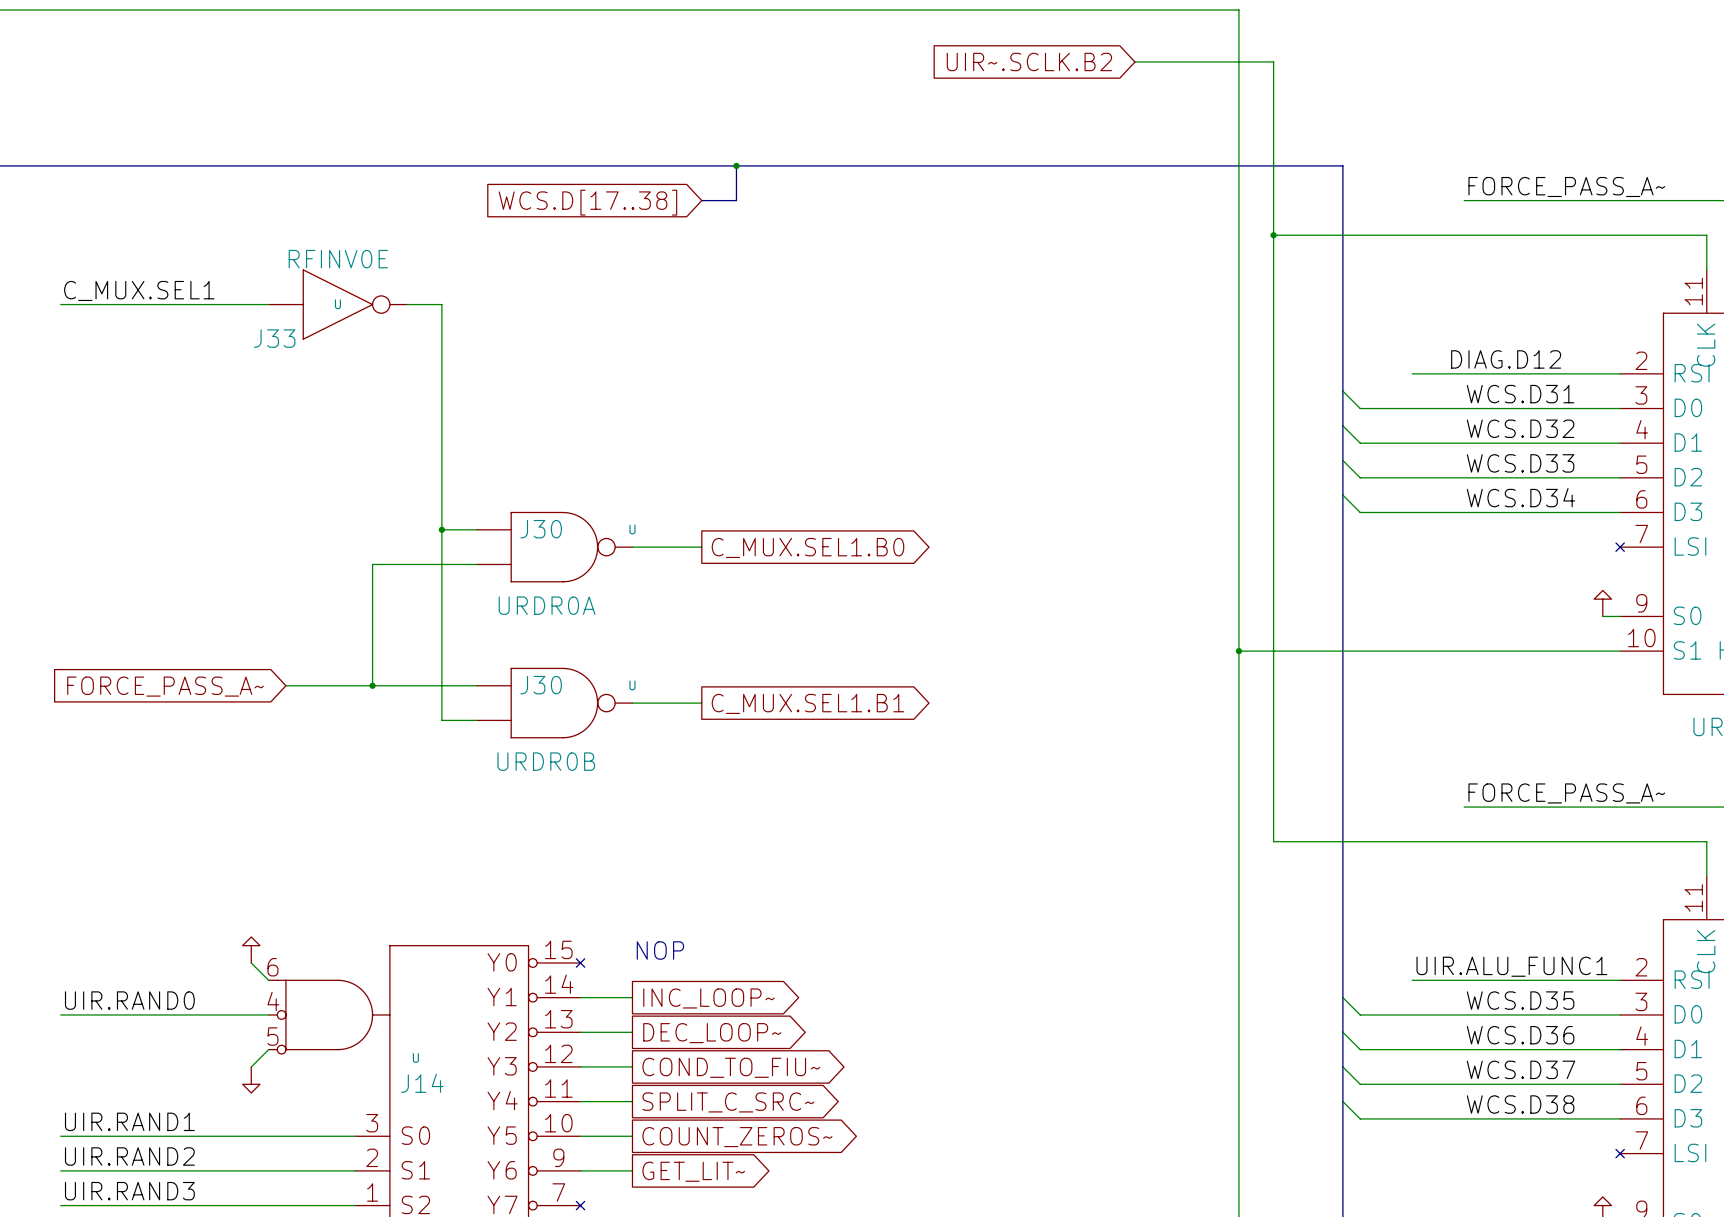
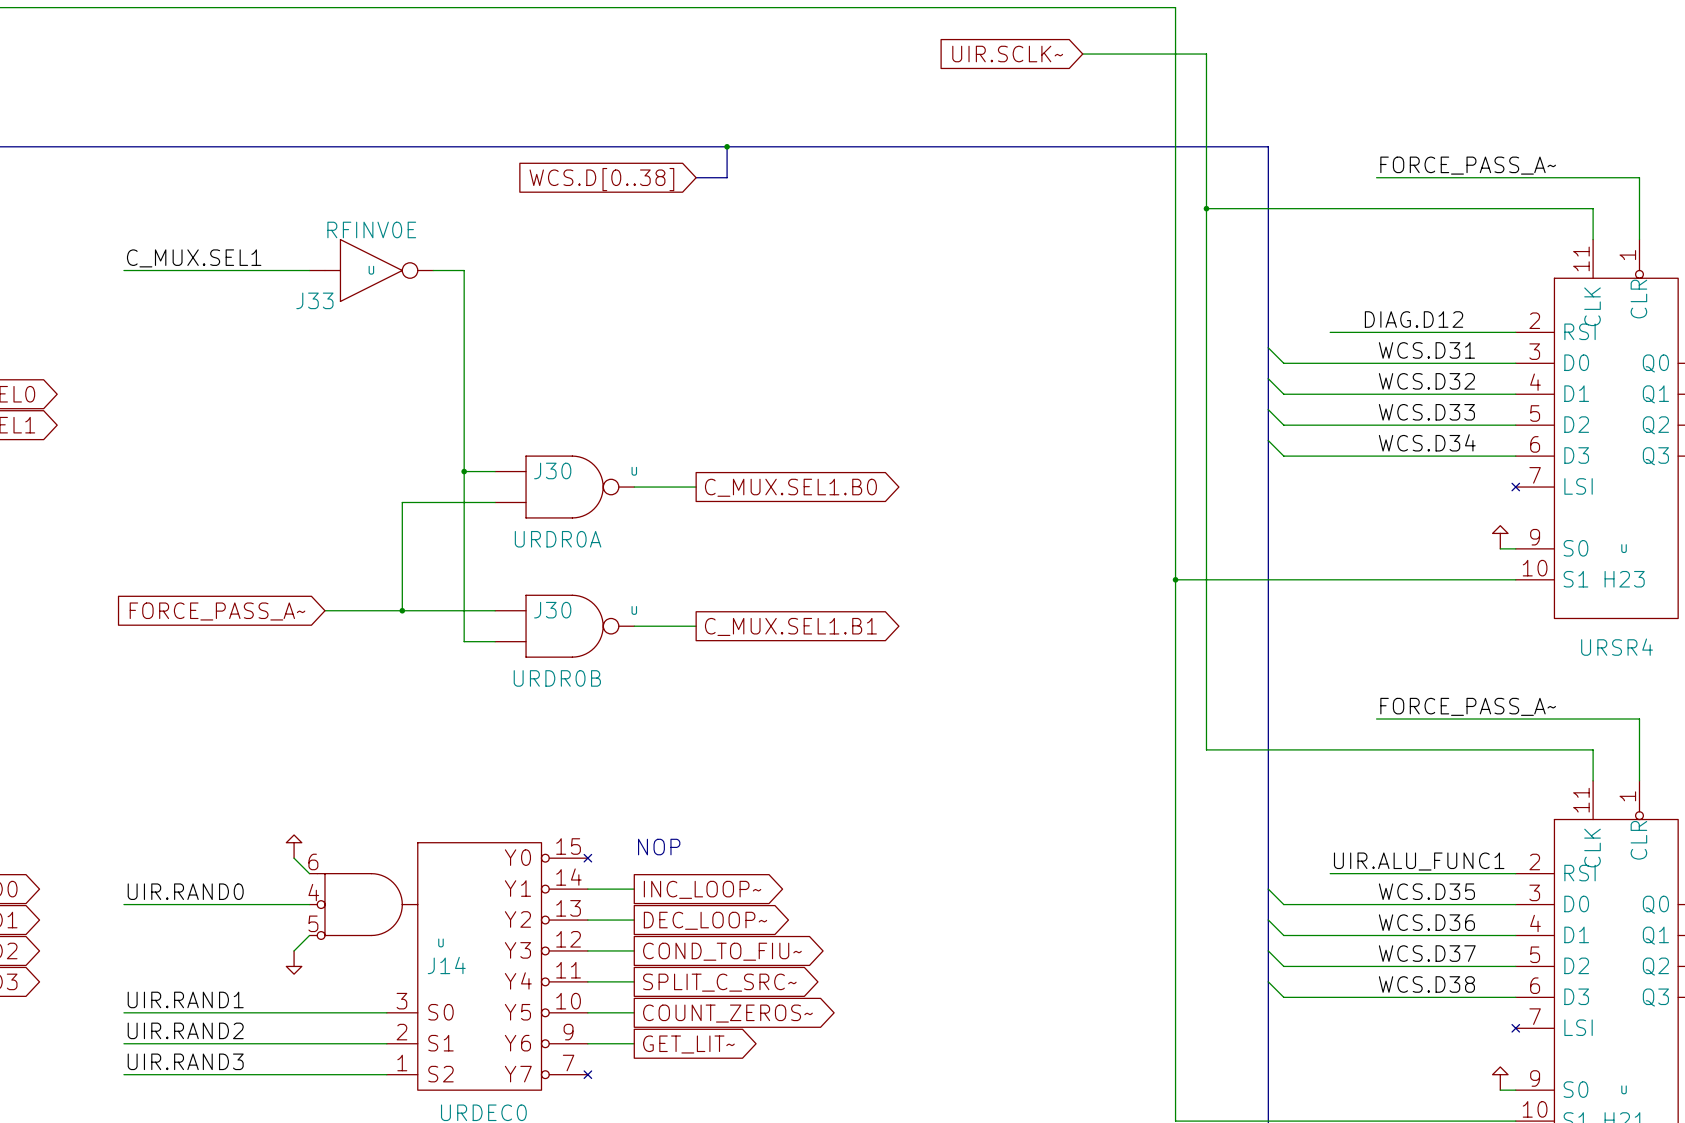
global label: UIR~.SCLK.B2 (1029, 61) -> UIR.SCLK~ (1007, 54)
global label: WCS.D[17..38] (587, 202) -> WCS.D[0..38] (601, 179)

